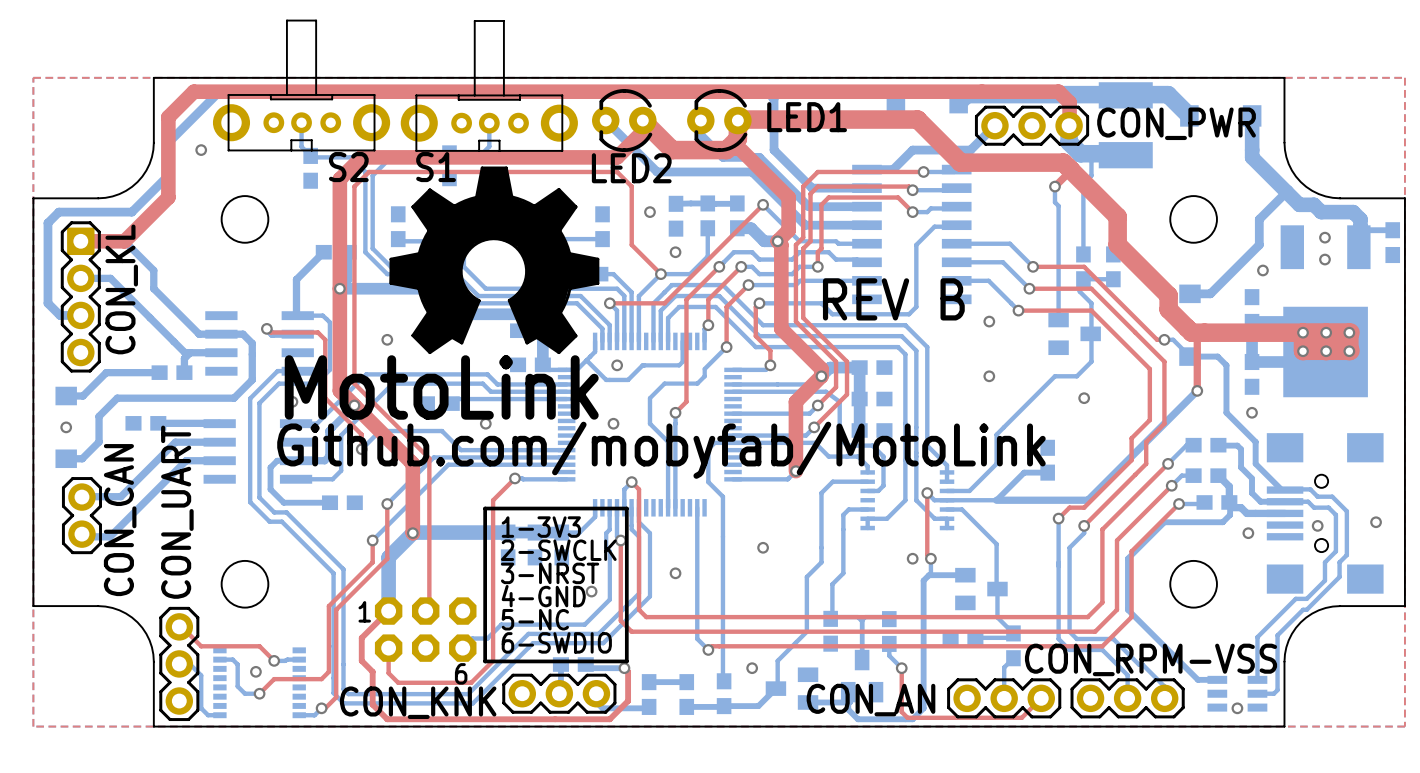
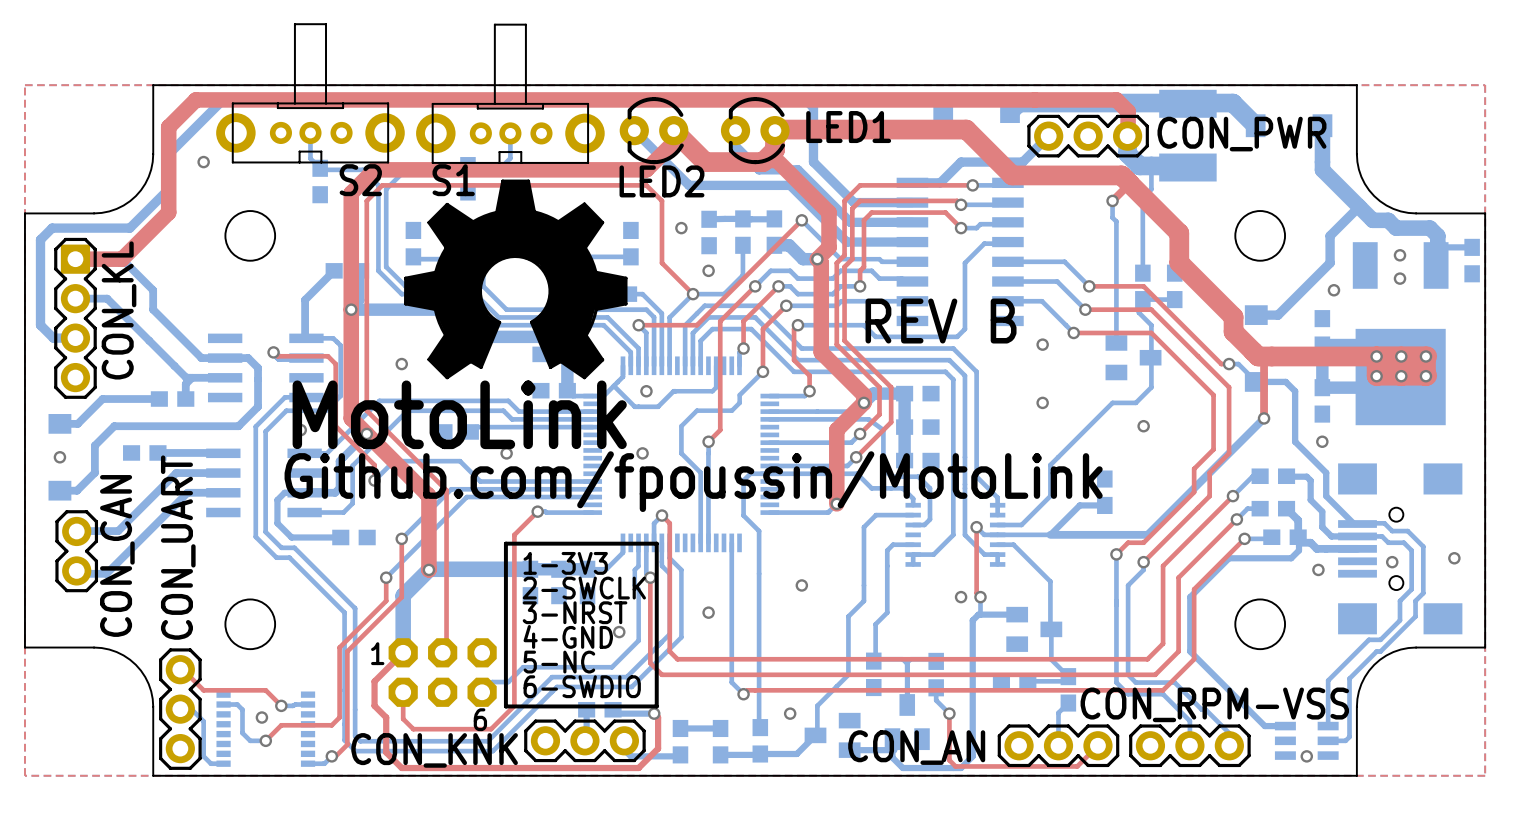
text: Github.com/mobyfab/MotoLink (661, 450) -> Github.com/fpoussin/MotoLink (693, 481)

